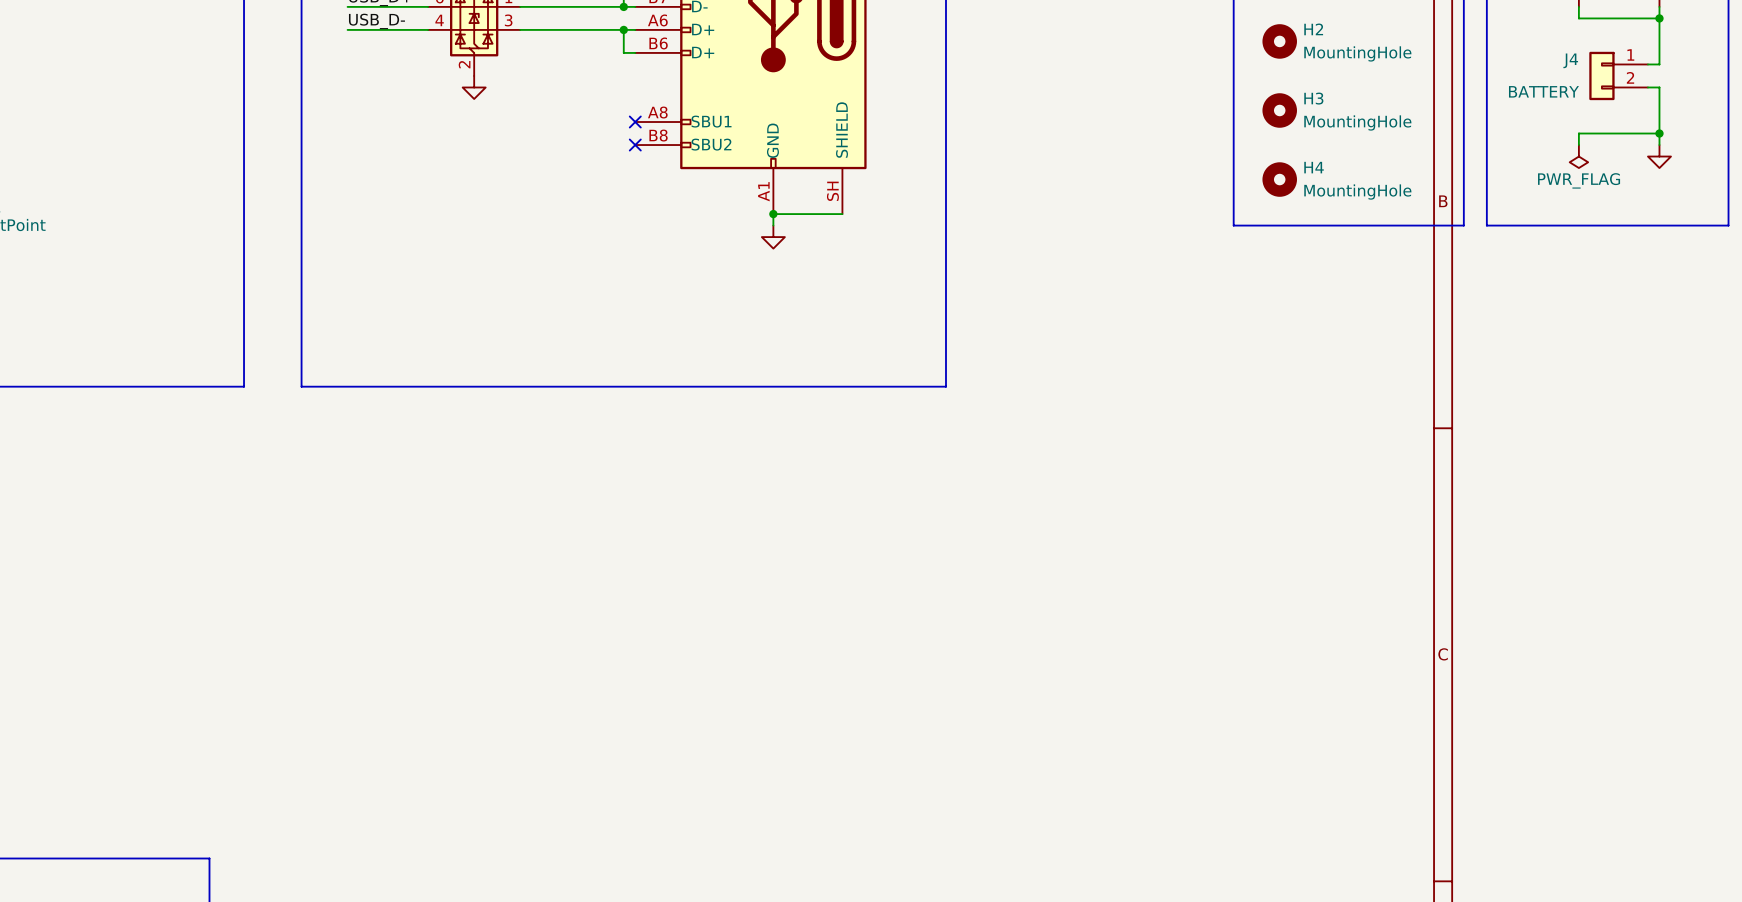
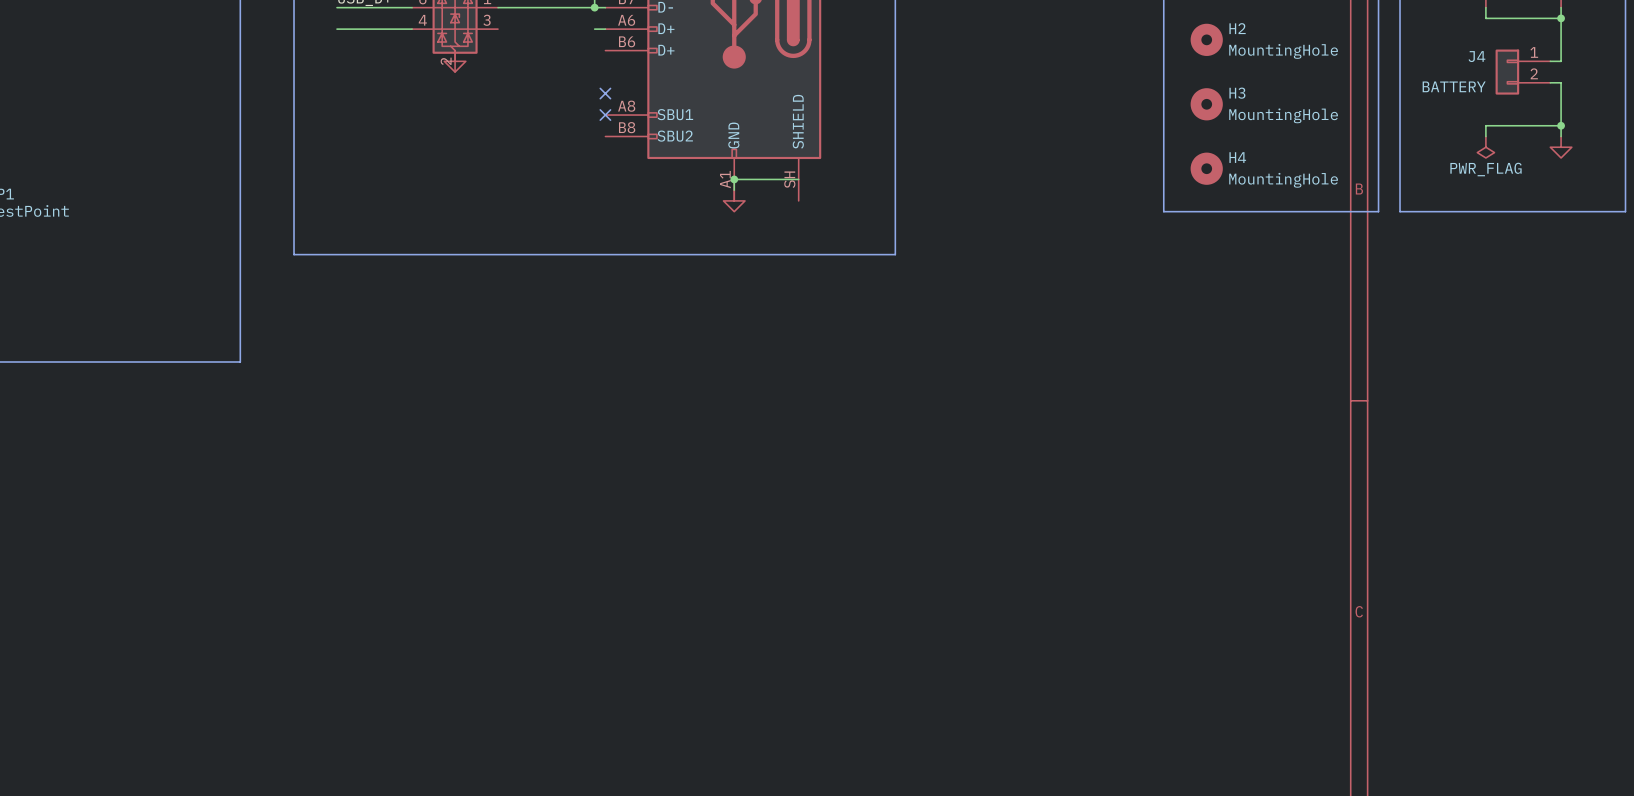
label: USB_D- (376, 21) -> none
wire: (520, 29) (623, 29) (623, 52) (635, 52) -> none
junction: (623, 29) -> none
power symbol position: (474, 87) -> (455, 61)
no-connect mark position: (635, 145) -> (605, 93)
junction position: (773, 214) -> (734, 179)
wire: (842, 214) (773, 214) (773, 225) -> (798, 179) (734, 179) (734, 190)
power symbol position: (773, 237) -> (734, 200)
line: (301, 271) (301, 386) (945, 386) (945, 271) -> (294, 254) (895, 254)

